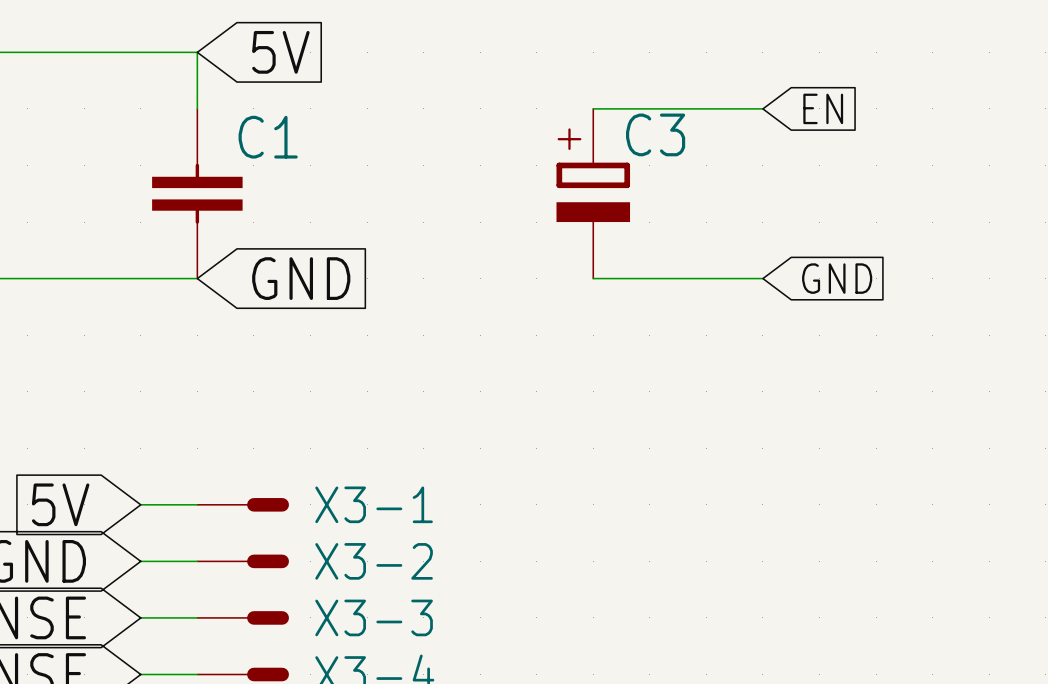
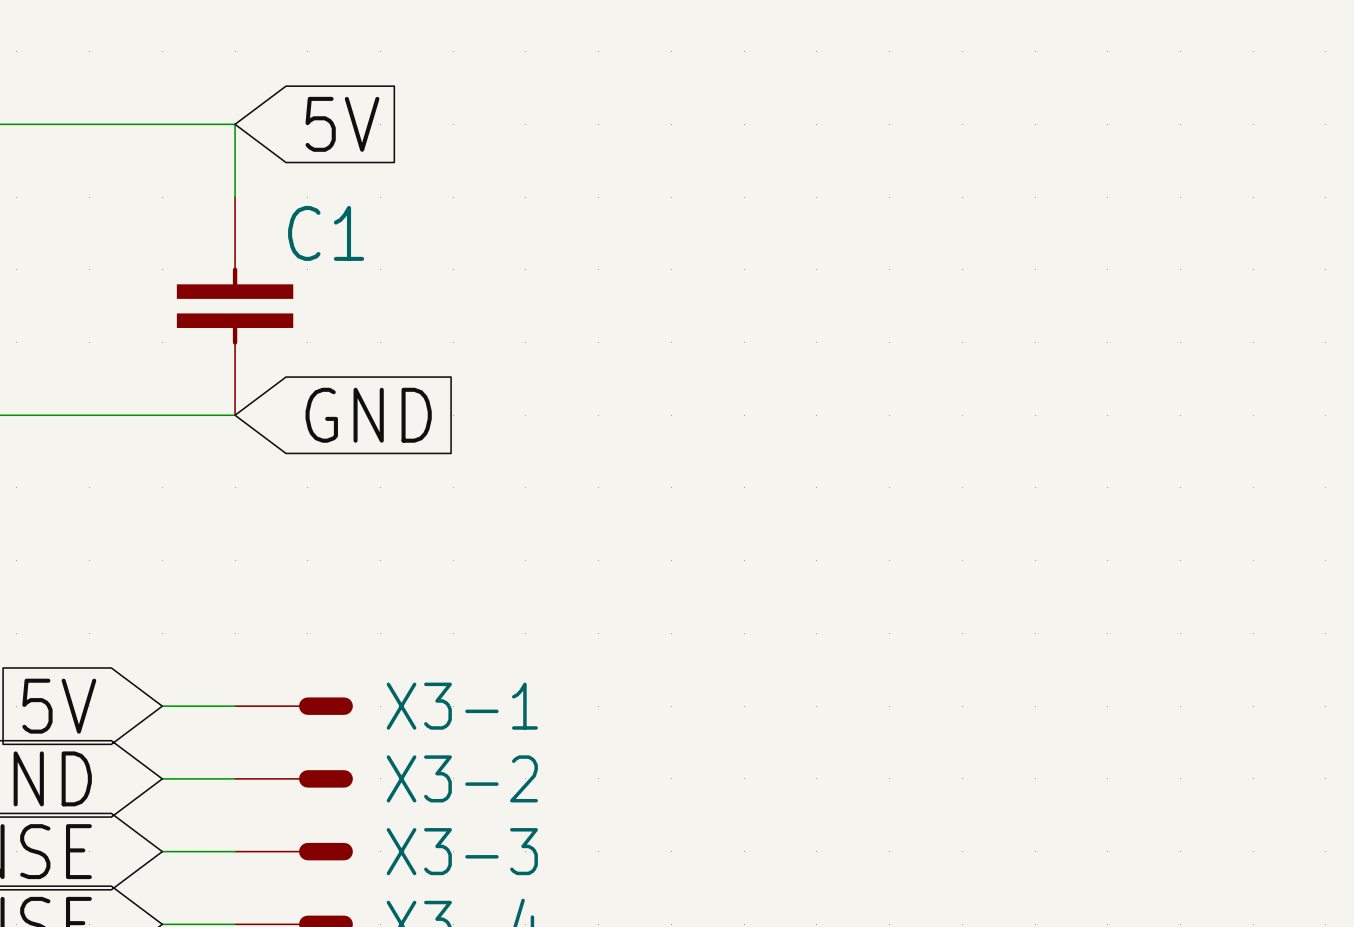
wire: (593, 108) (762, 108) -> none
global label: EN (823, 108) -> none
C3: (593, 193) -> none
wire: (593, 278) (762, 278) -> none
global label: GND (837, 278) -> none

